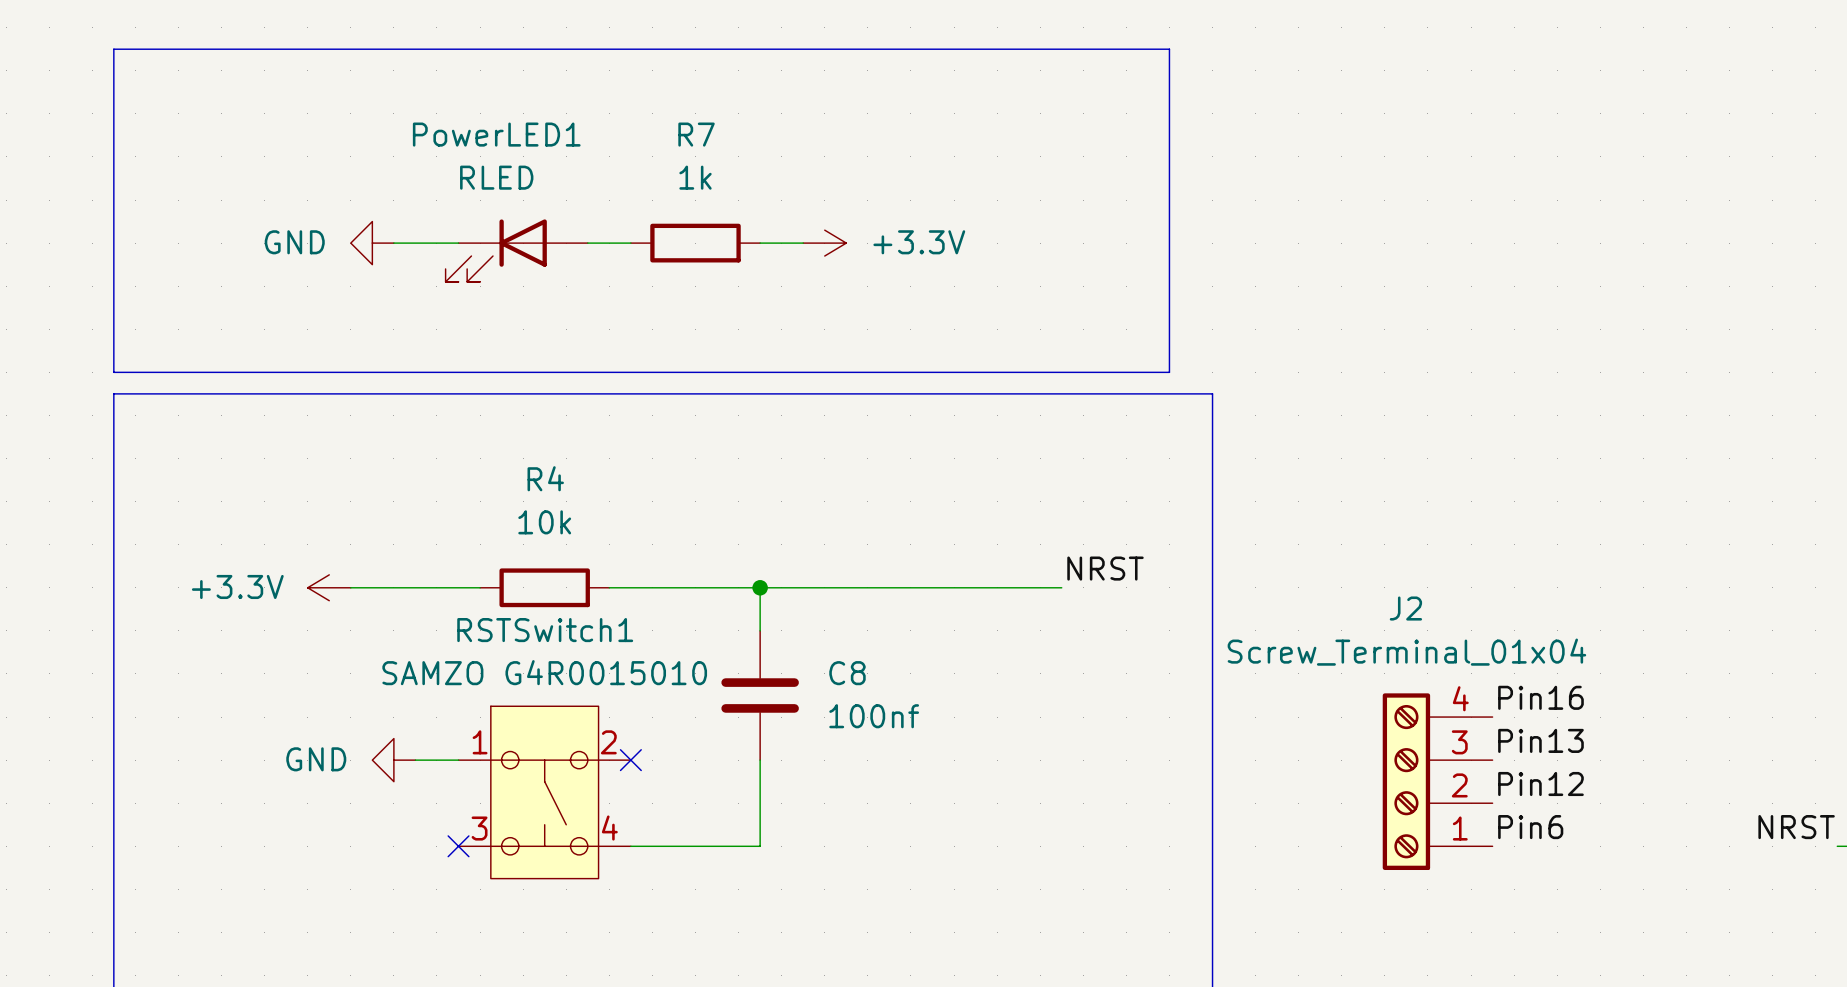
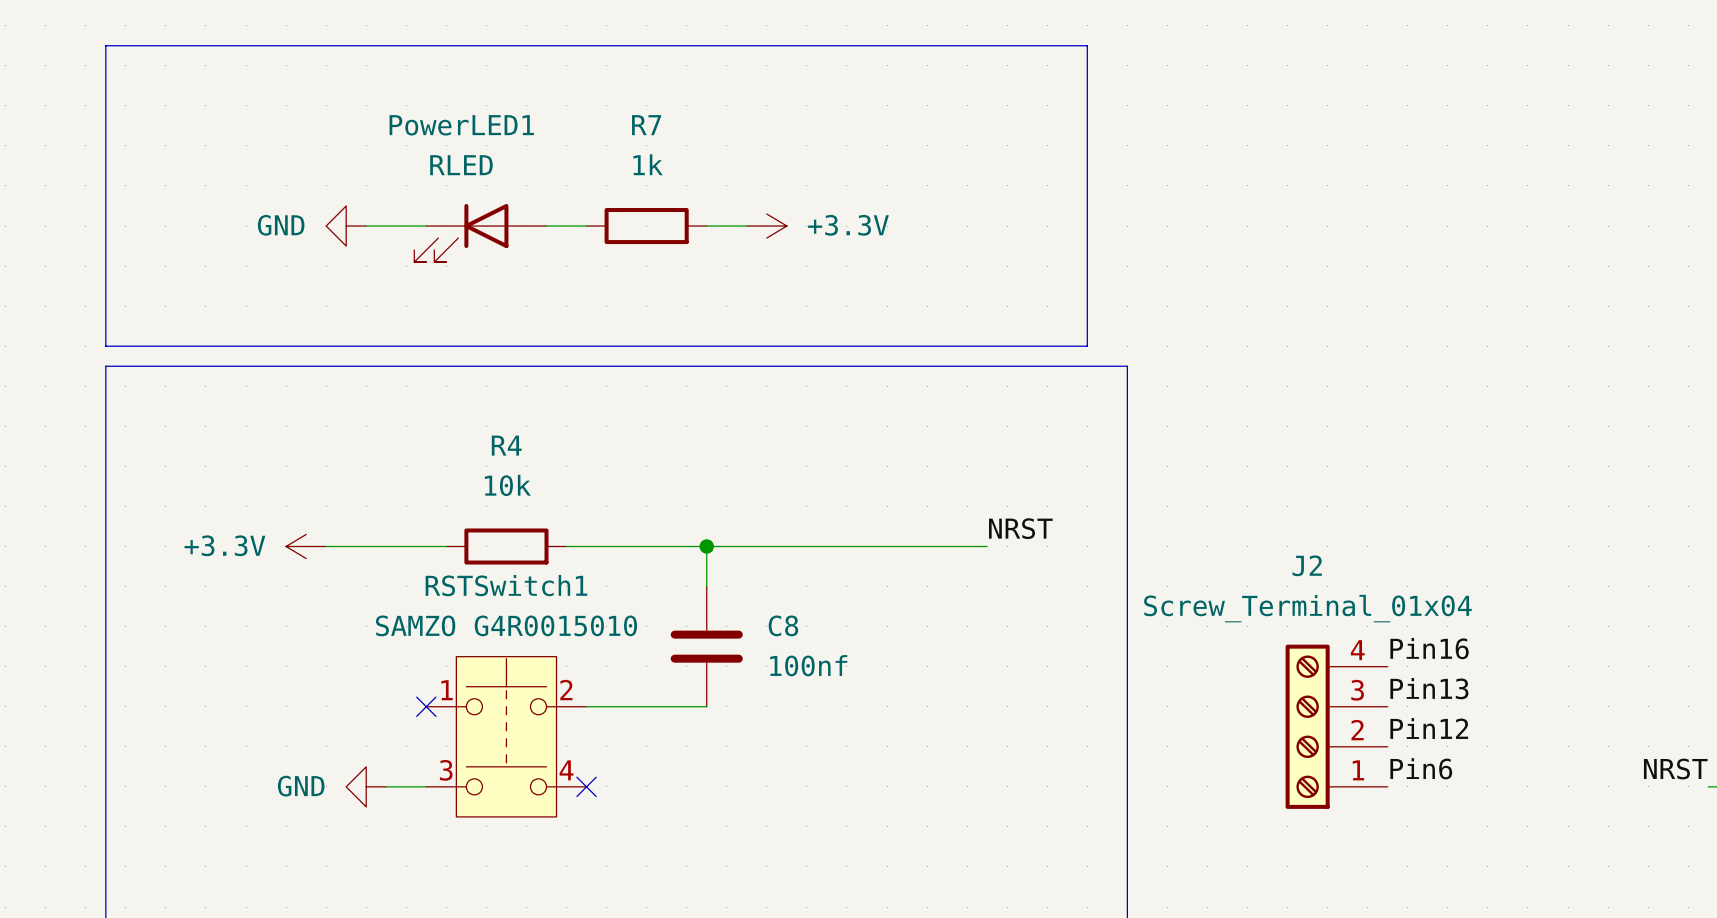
RSTSwitch1 symbol: [458, 706, 631, 879] -> [426, 656, 587, 817]
power symbol position: GND (393, 760) -> GND (366, 786)
wire: (415, 760) (458, 760) -> (386, 786) (426, 786)
no-connect mark: none -> (426, 706)
no-connect mark: (630, 760) -> none
wire: (760, 760) (760, 846) (630, 846) -> (706, 706) (586, 706)
no-connect mark: (458, 846) -> none
no-connect mark: none -> (586, 786)

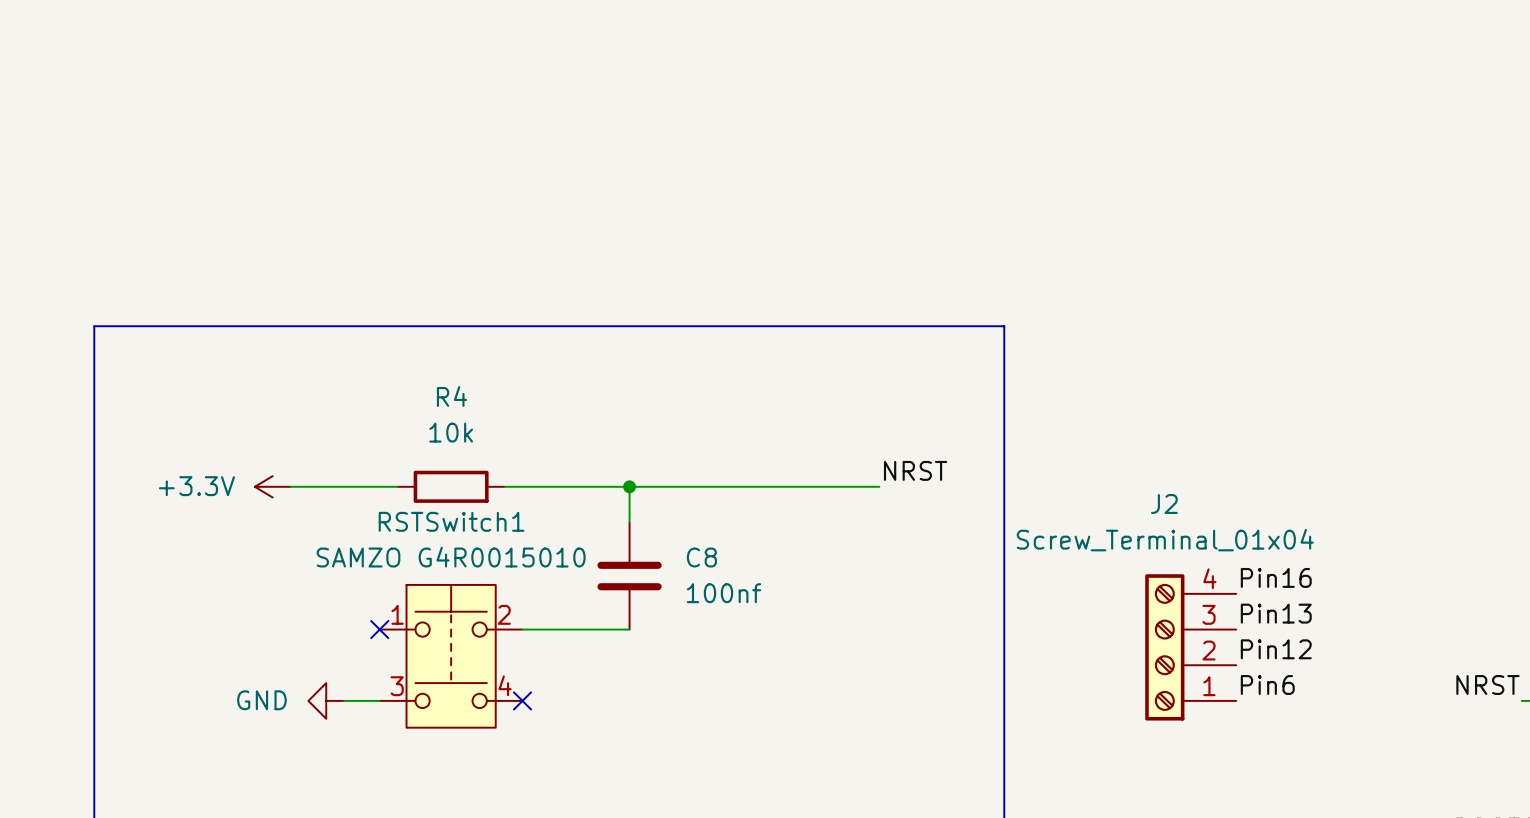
line: (105, 45) (1087, 45) (1087, 346) (105, 346) (105, 45) -> none
power symbol: GND (346, 226) -> none
wire: (366, 226) (426, 226) -> none
wire: (546, 226) (586, 226) -> none
R7: 1k (646, 226) -> none
wire: (706, 226) (746, 226) -> none
power symbol: +3.3V (766, 226) -> none
PowerLED1: RLED (480, 233) -> none

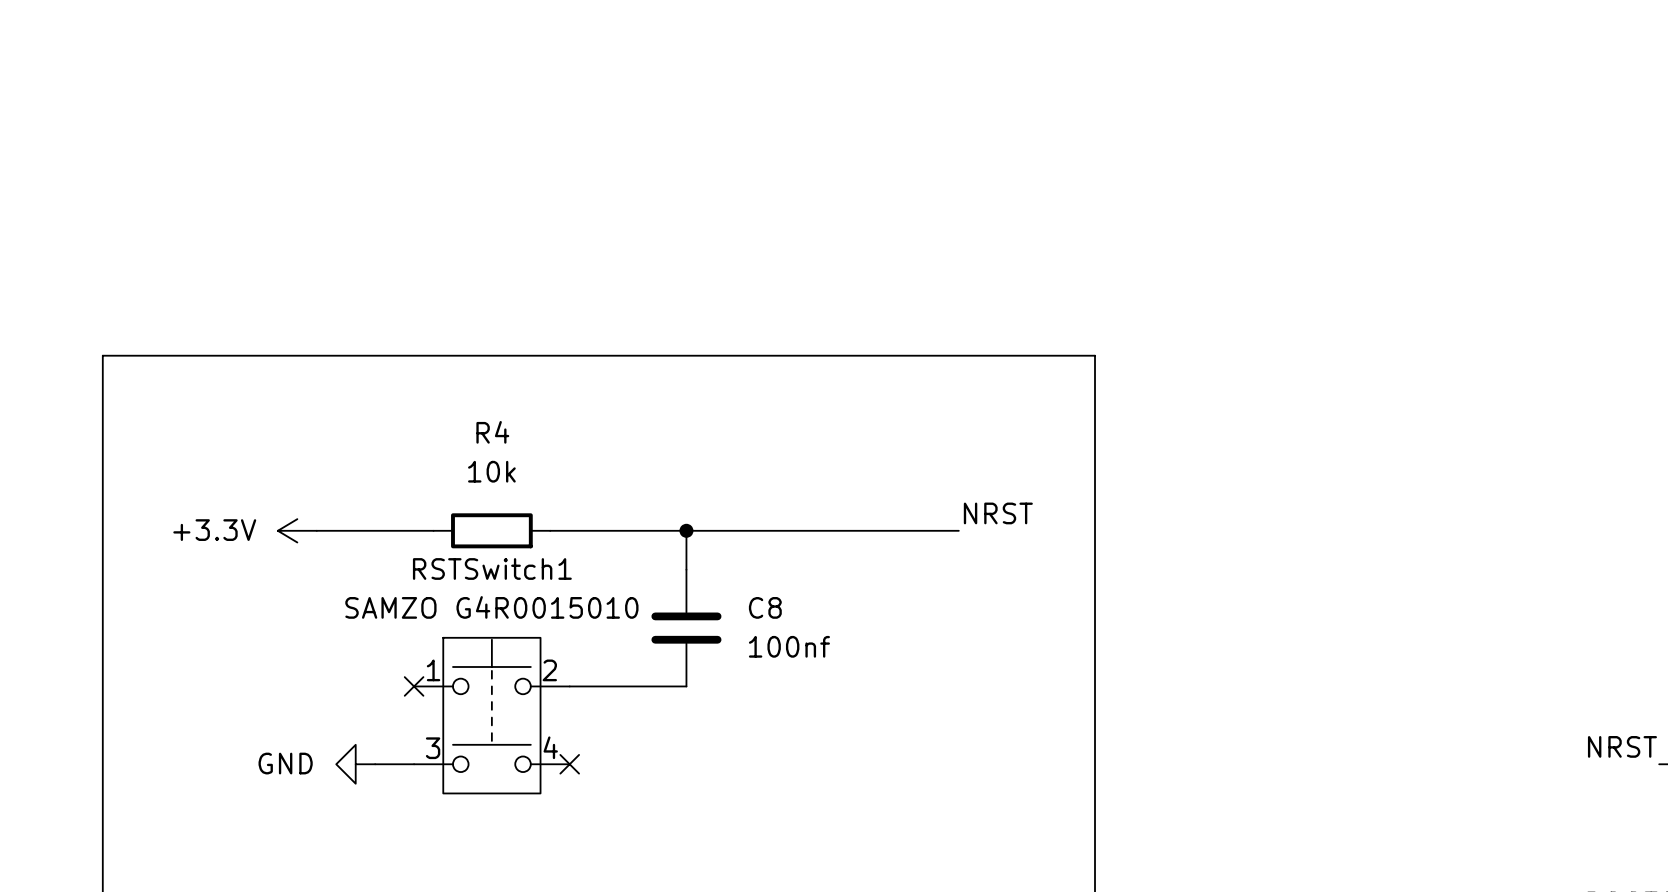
label: Pin16 (1276, 577) -> none
label: Pin13 (1276, 613) -> none
J2: Screw_Terminal_01x04 (1190, 647) -> none
label: Pin12 (1276, 649) -> none
label: Pin6 (1267, 685) -> none

